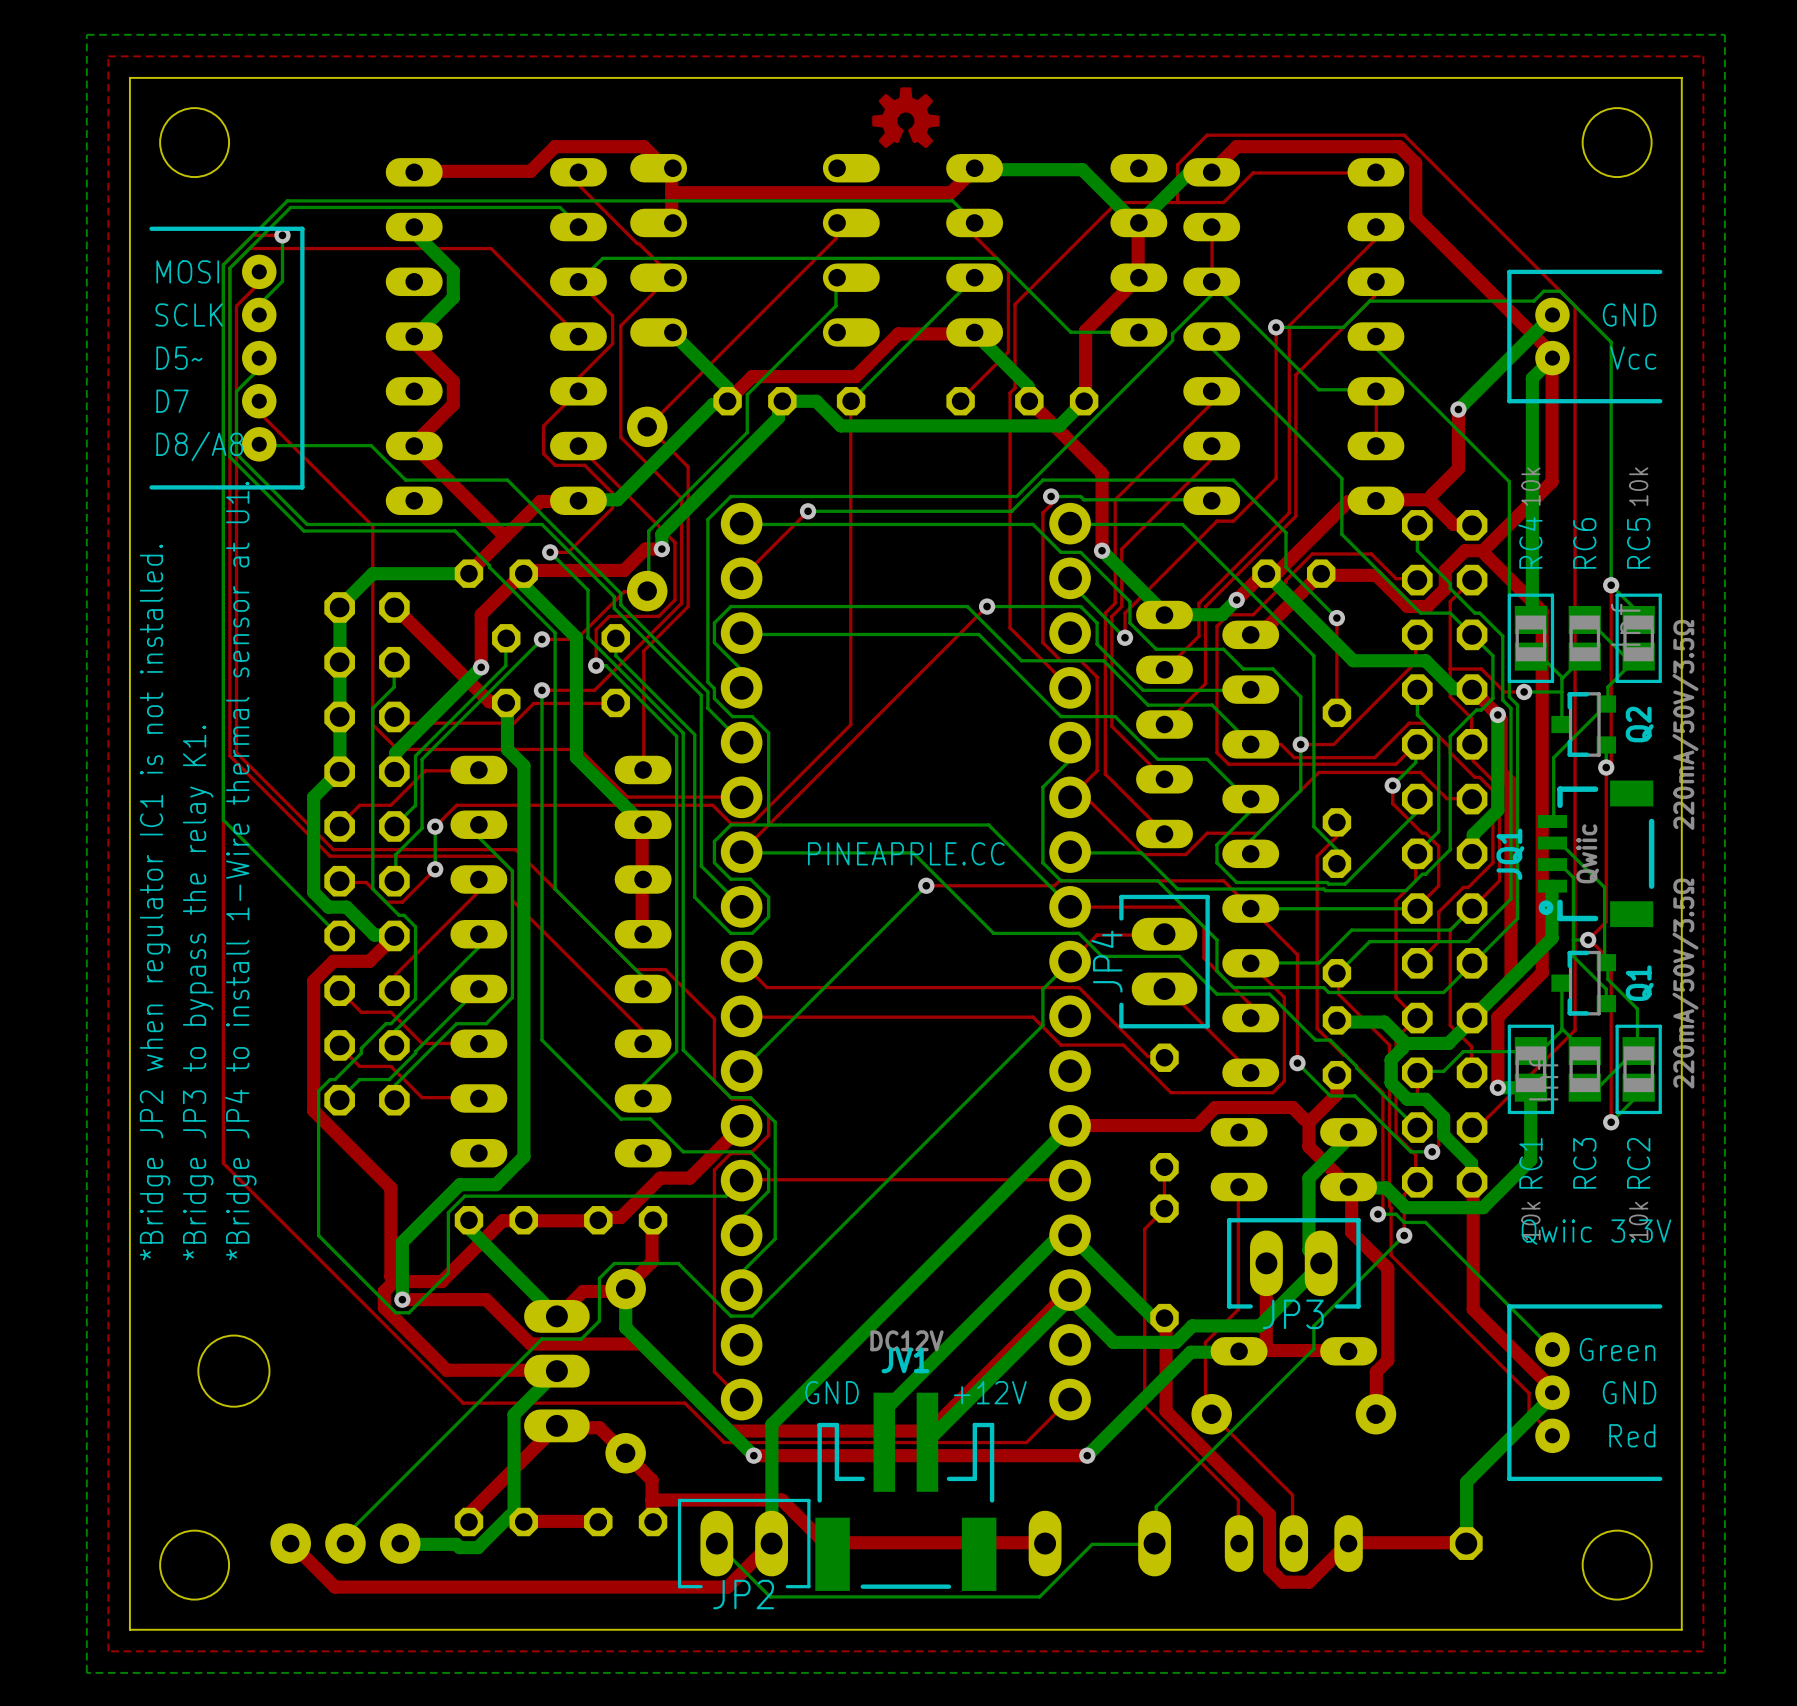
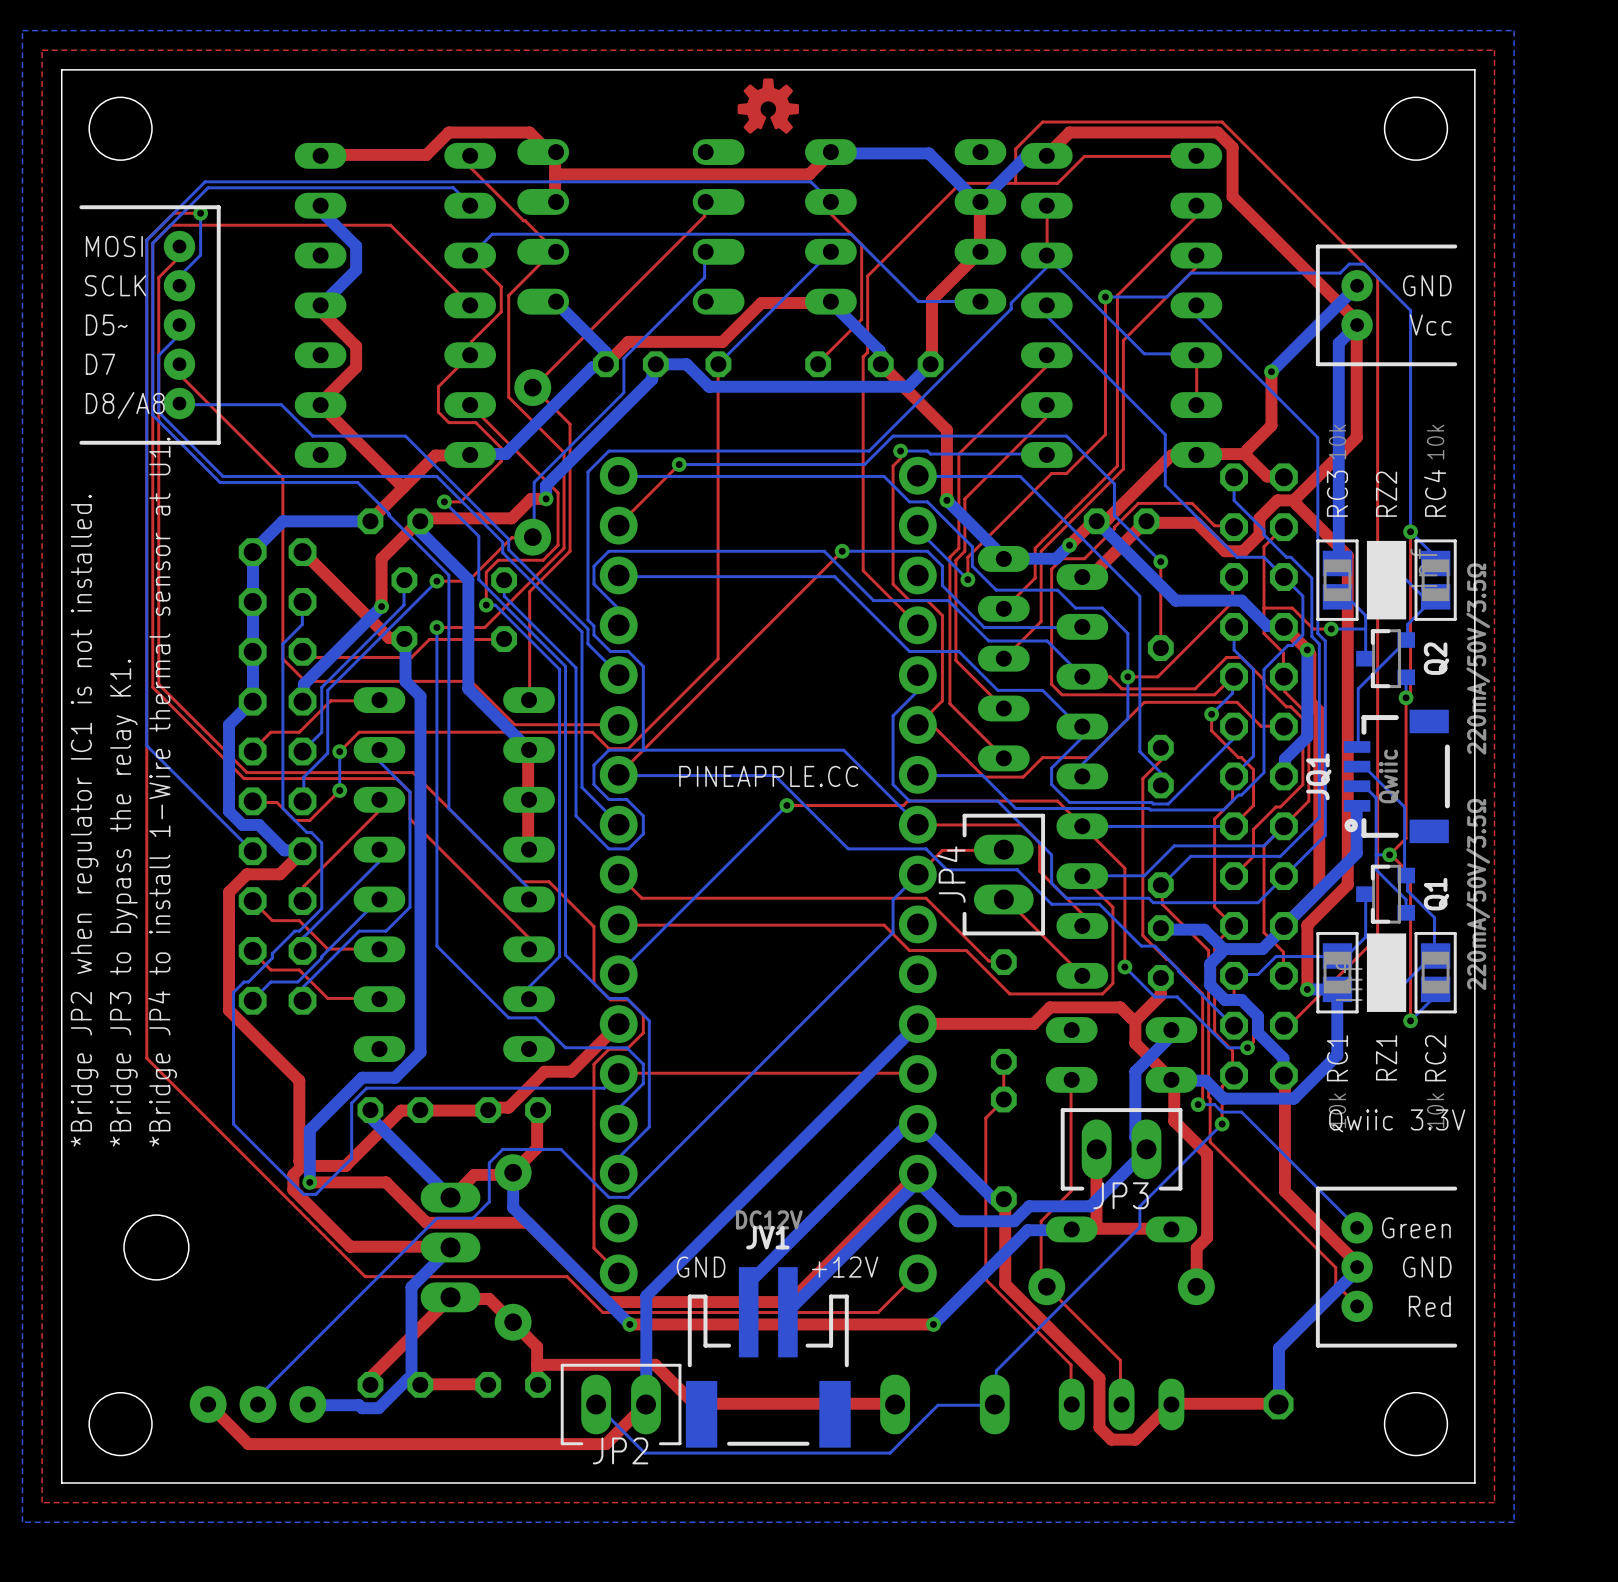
RC4 name: RC4 (1530, 542) -> RC3 (1337, 493)
RC6 name: RC6 (1584, 543) -> RZ2 (1386, 494)
RC5 name: RC5 (1638, 543) -> RC4 (1435, 493)
drawing: none -> [1366, 540, 1407, 620]
drawing: none -> [1366, 933, 1407, 1012]
RC3 name: RC3 (1584, 1163) -> RZ1 (1386, 1057)

